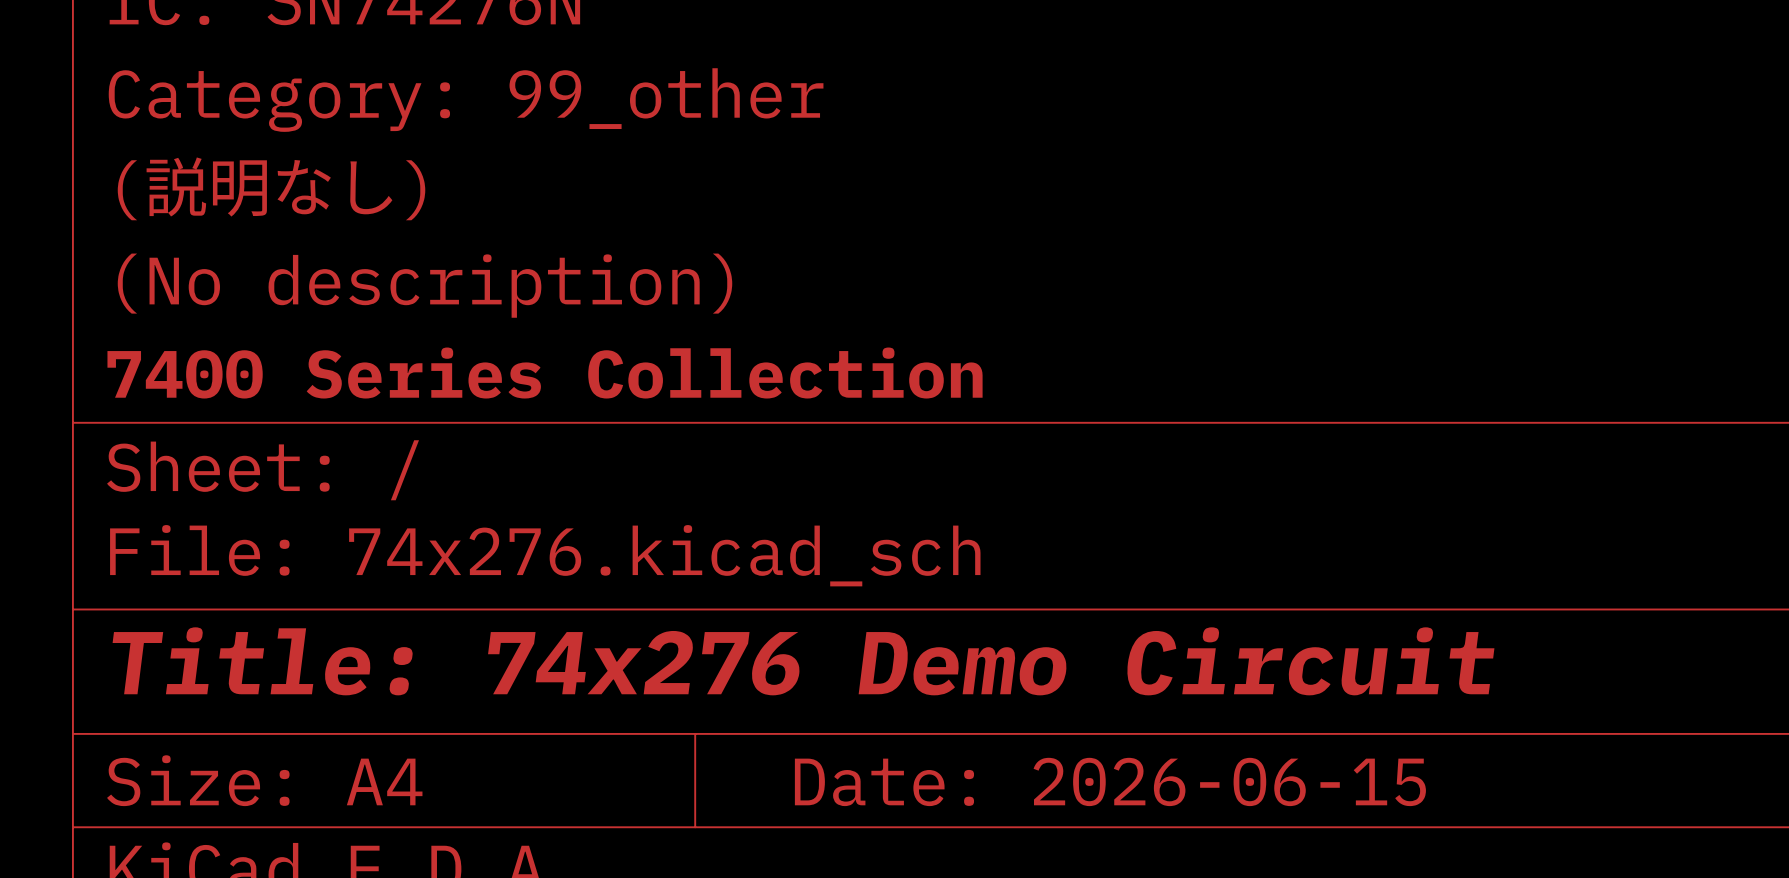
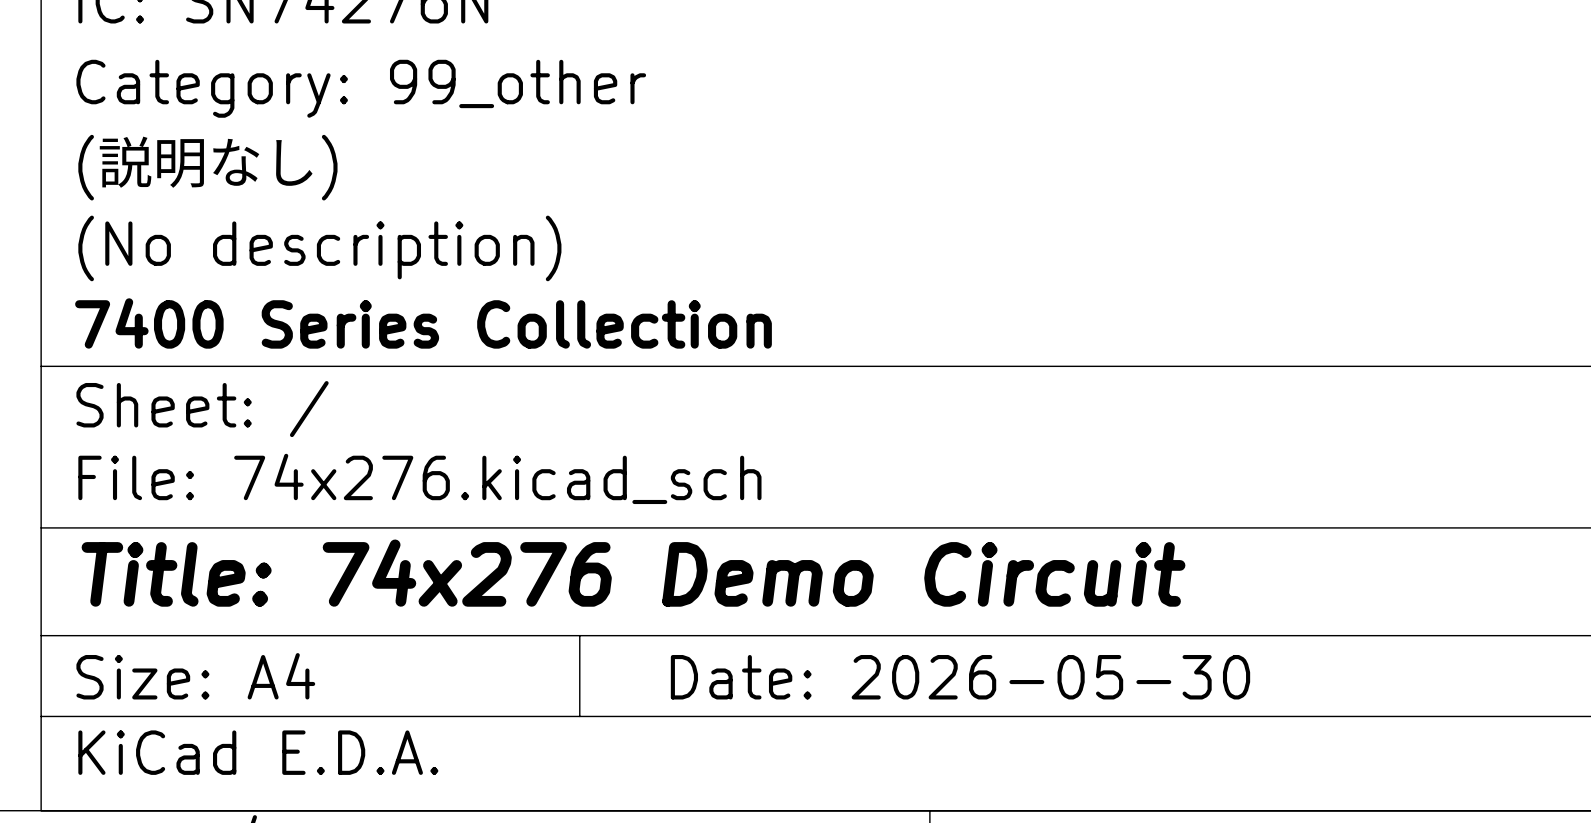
title block: Date: 2026-06-15 (1110, 781) -> Date: 2026-05-30 (960, 677)

